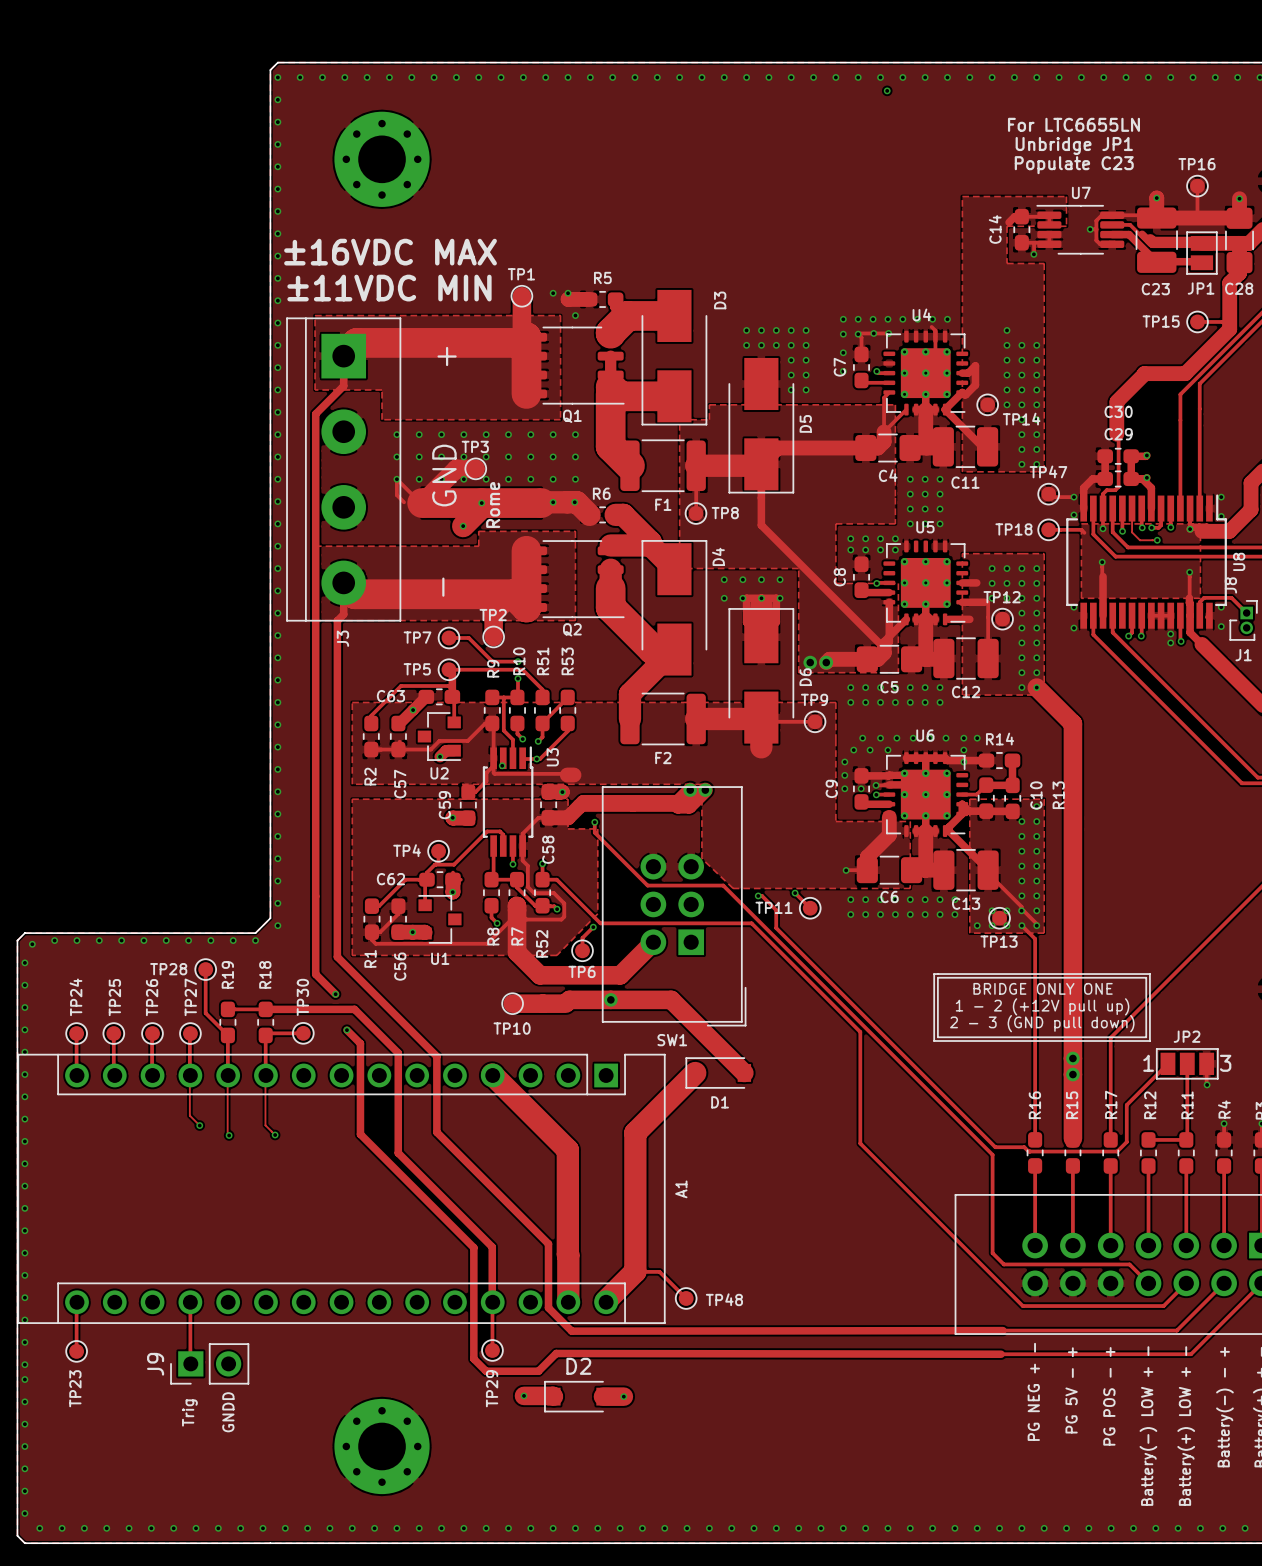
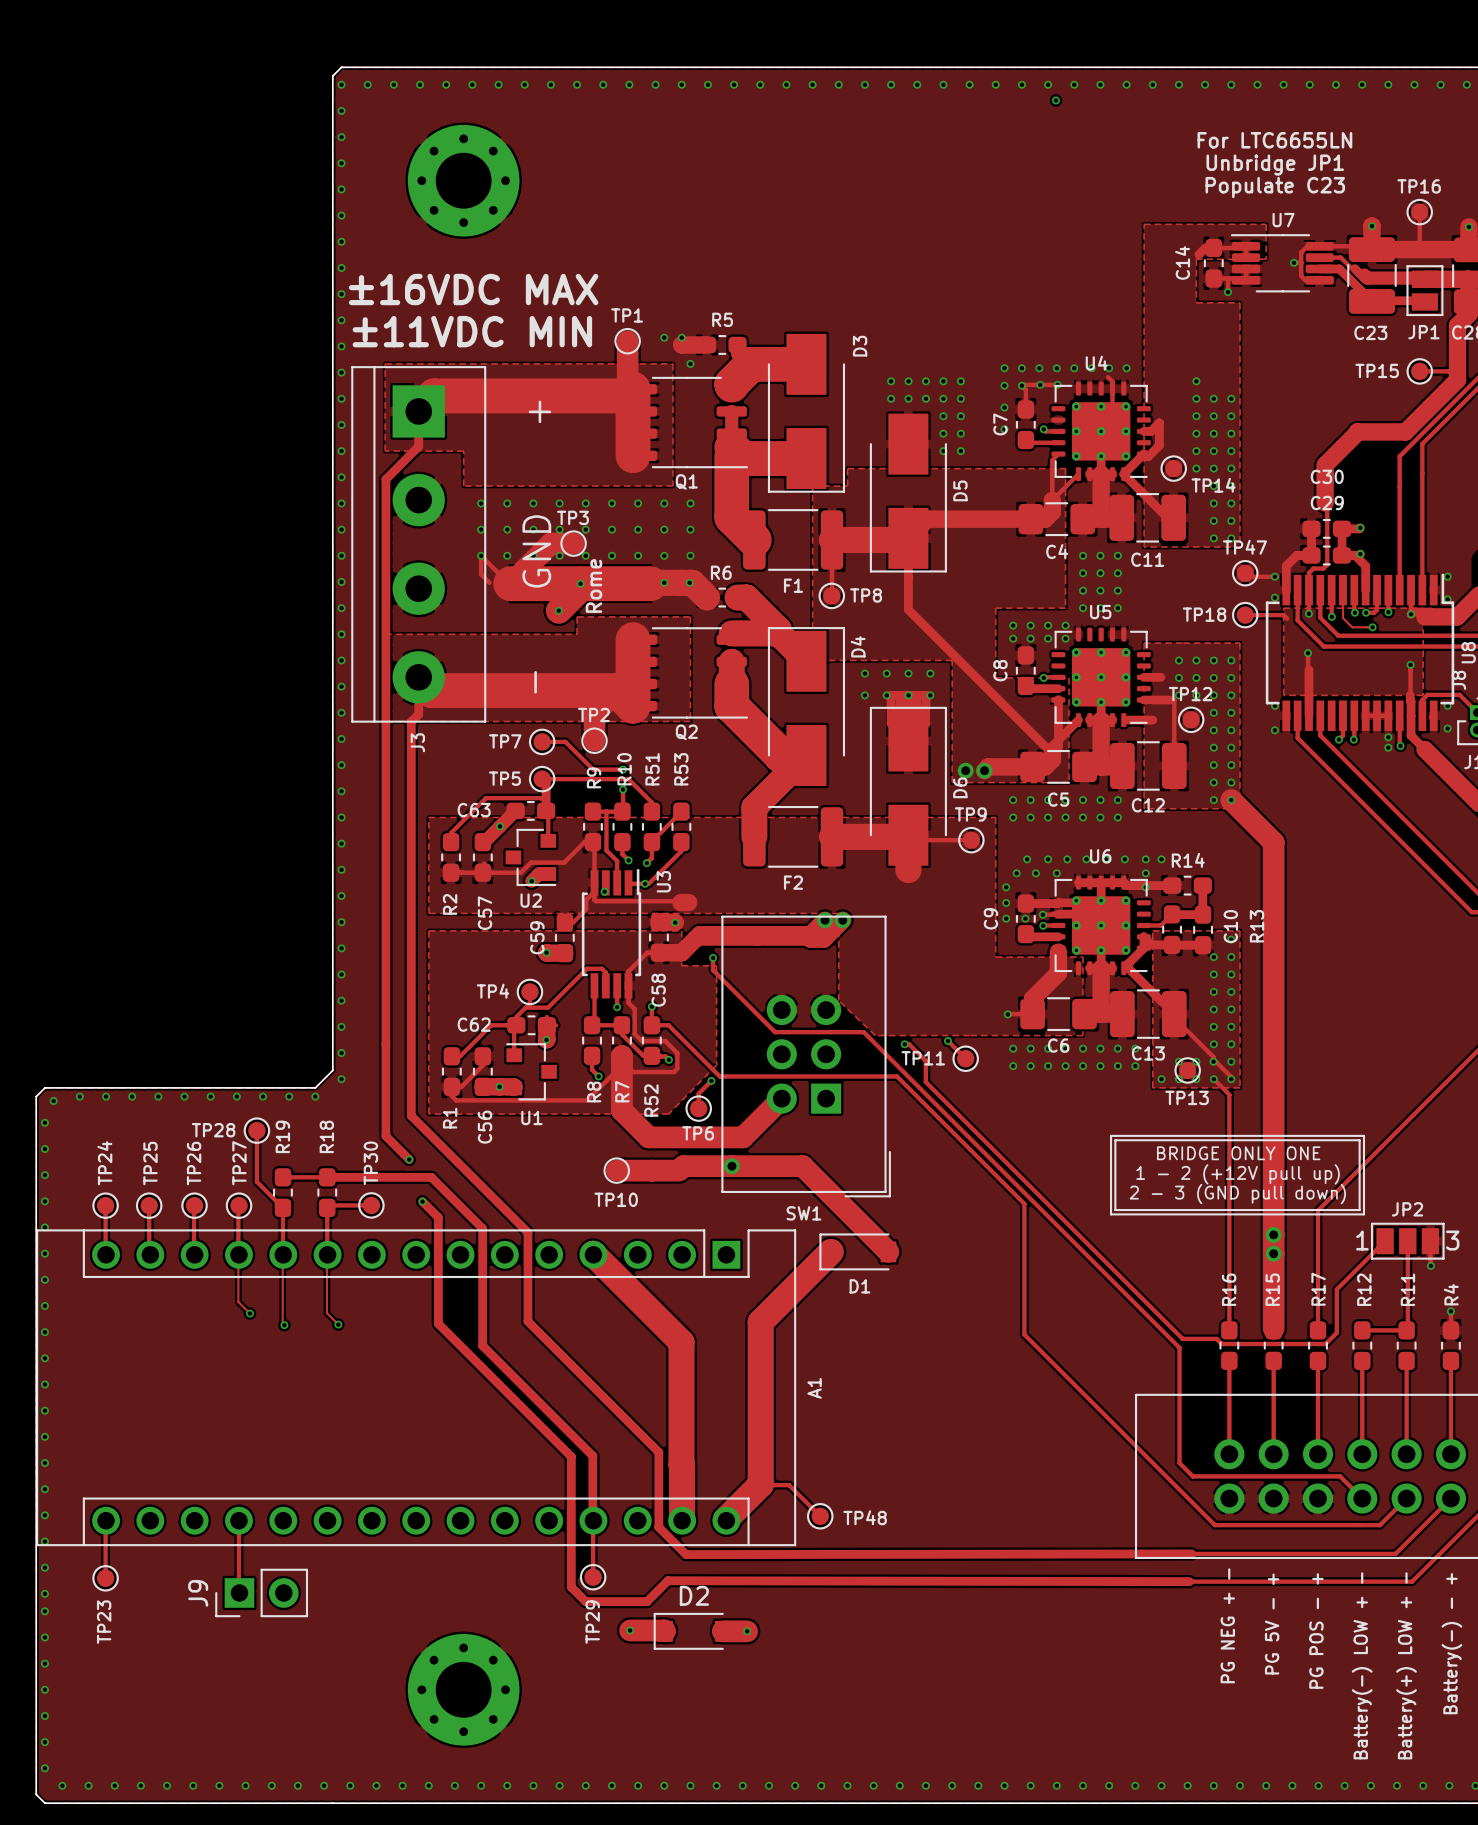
text: GNDD (228, 1412) -> none
text: Trig (189, 1413) -> none

